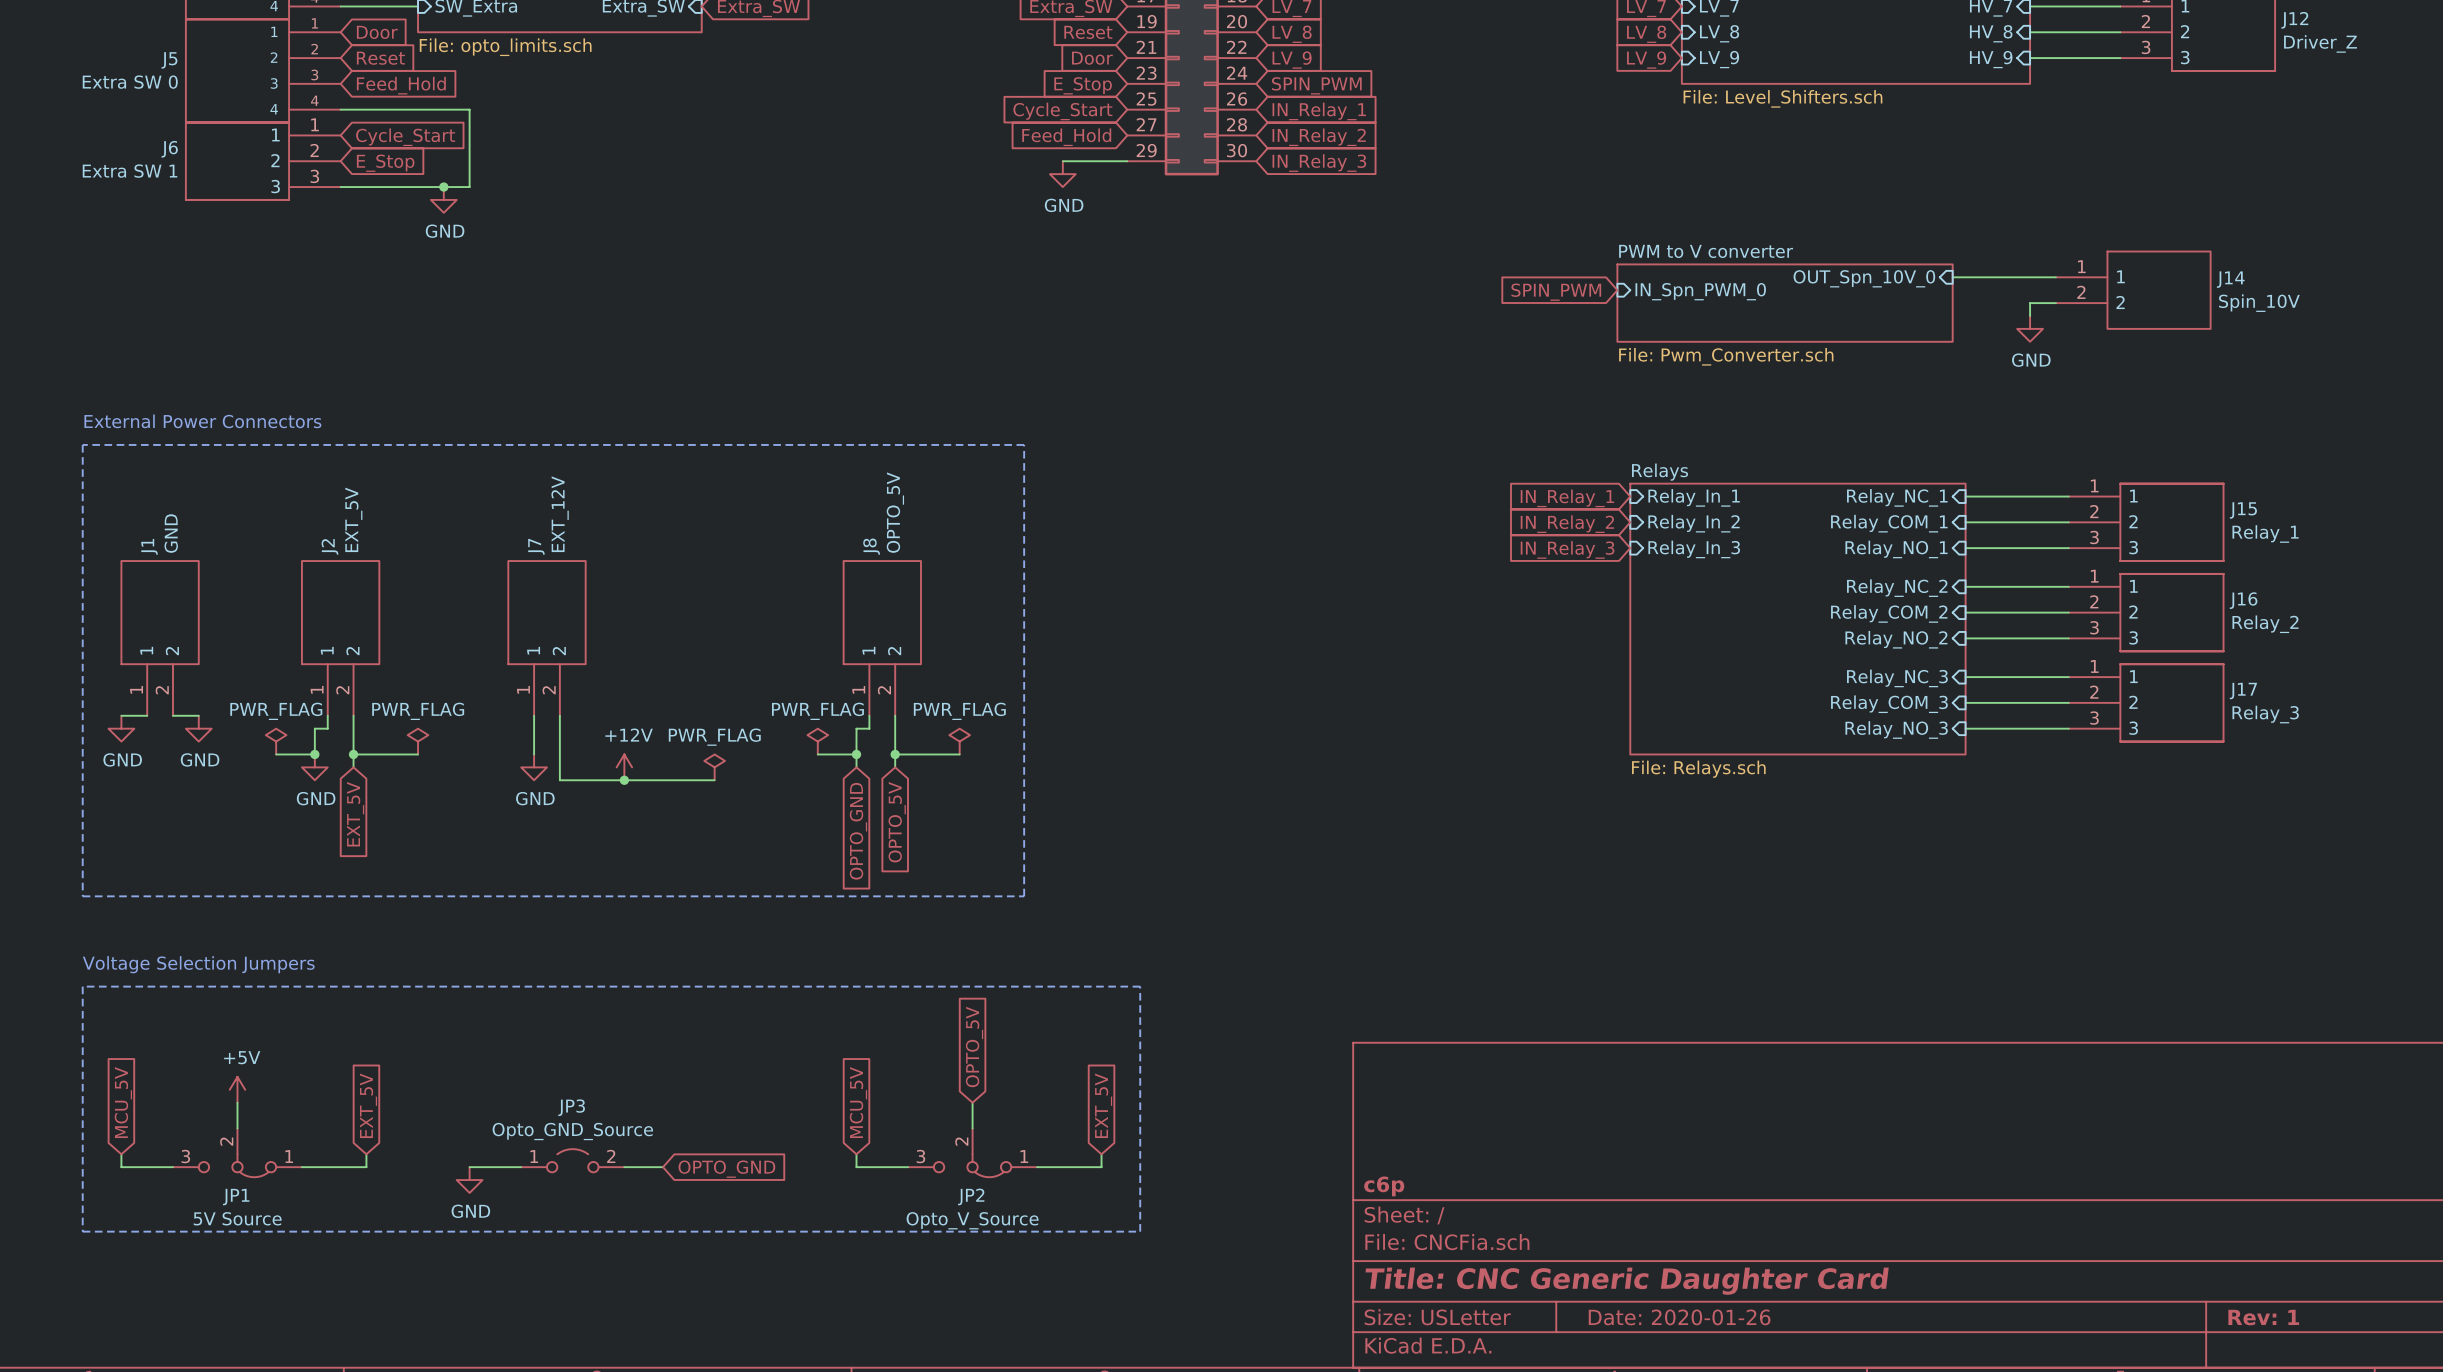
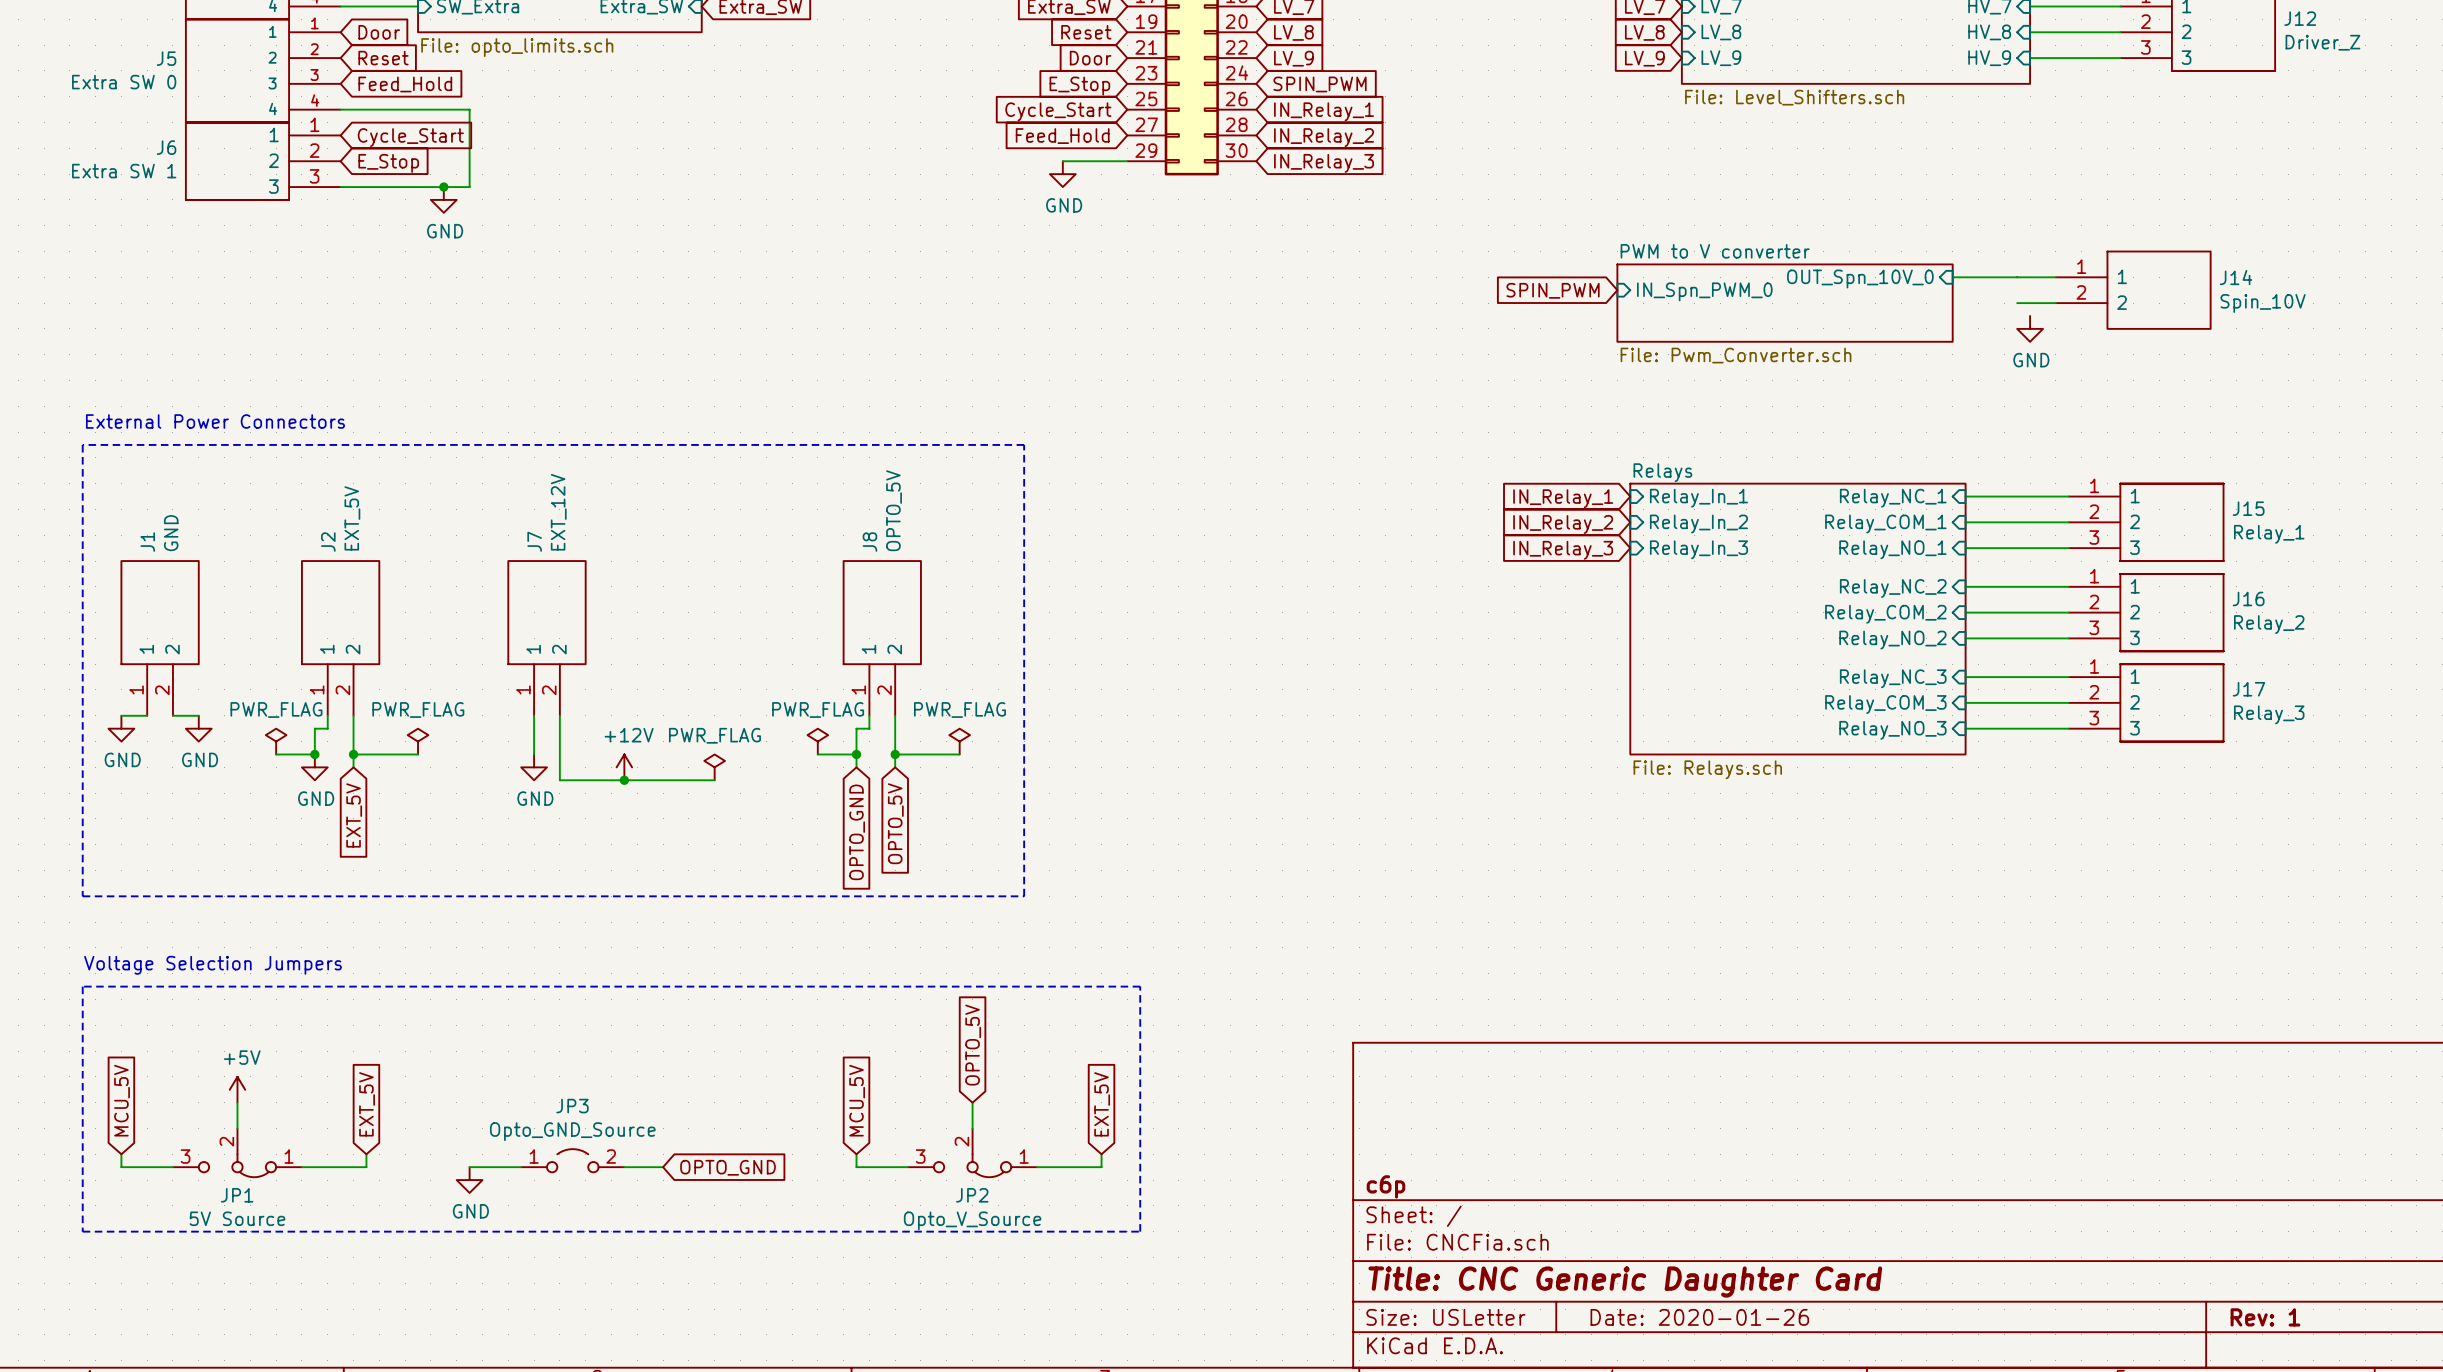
wire: (2030, 303) (2030, 316) -> (2030, 303) (2017, 303)

